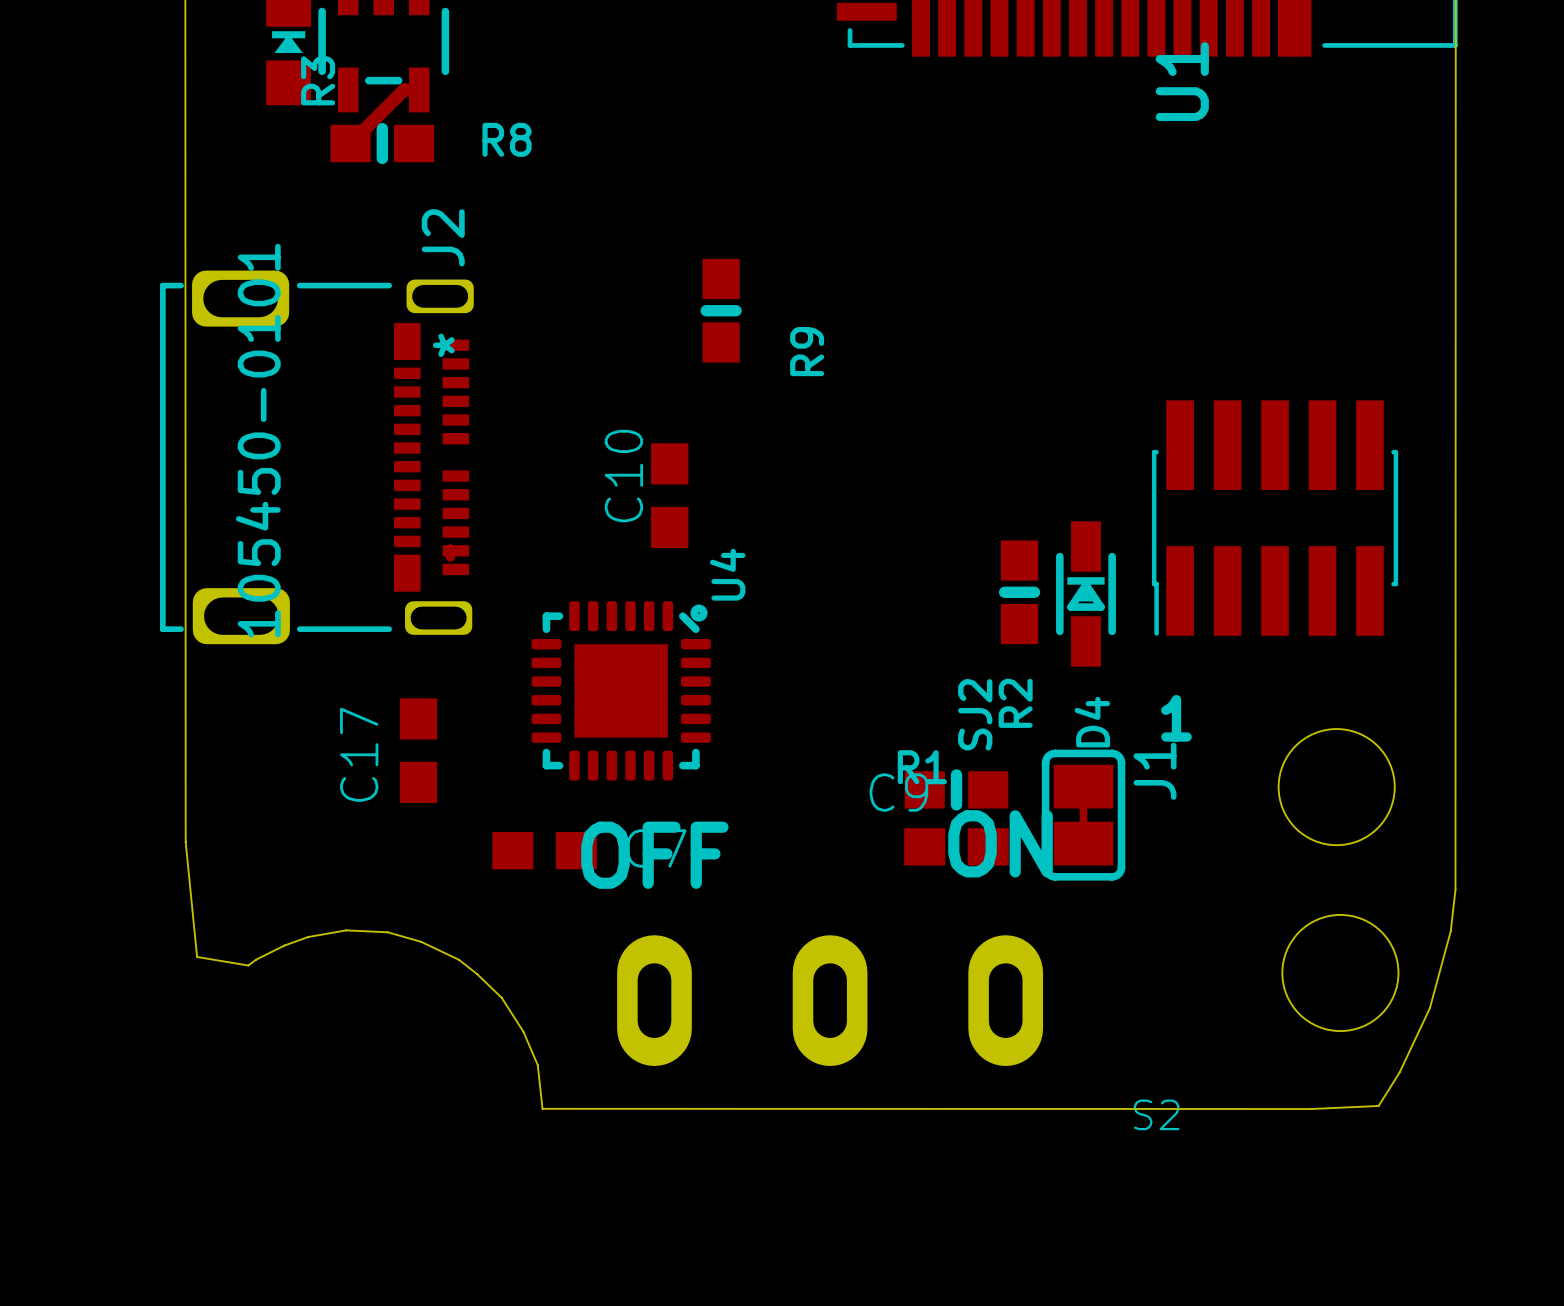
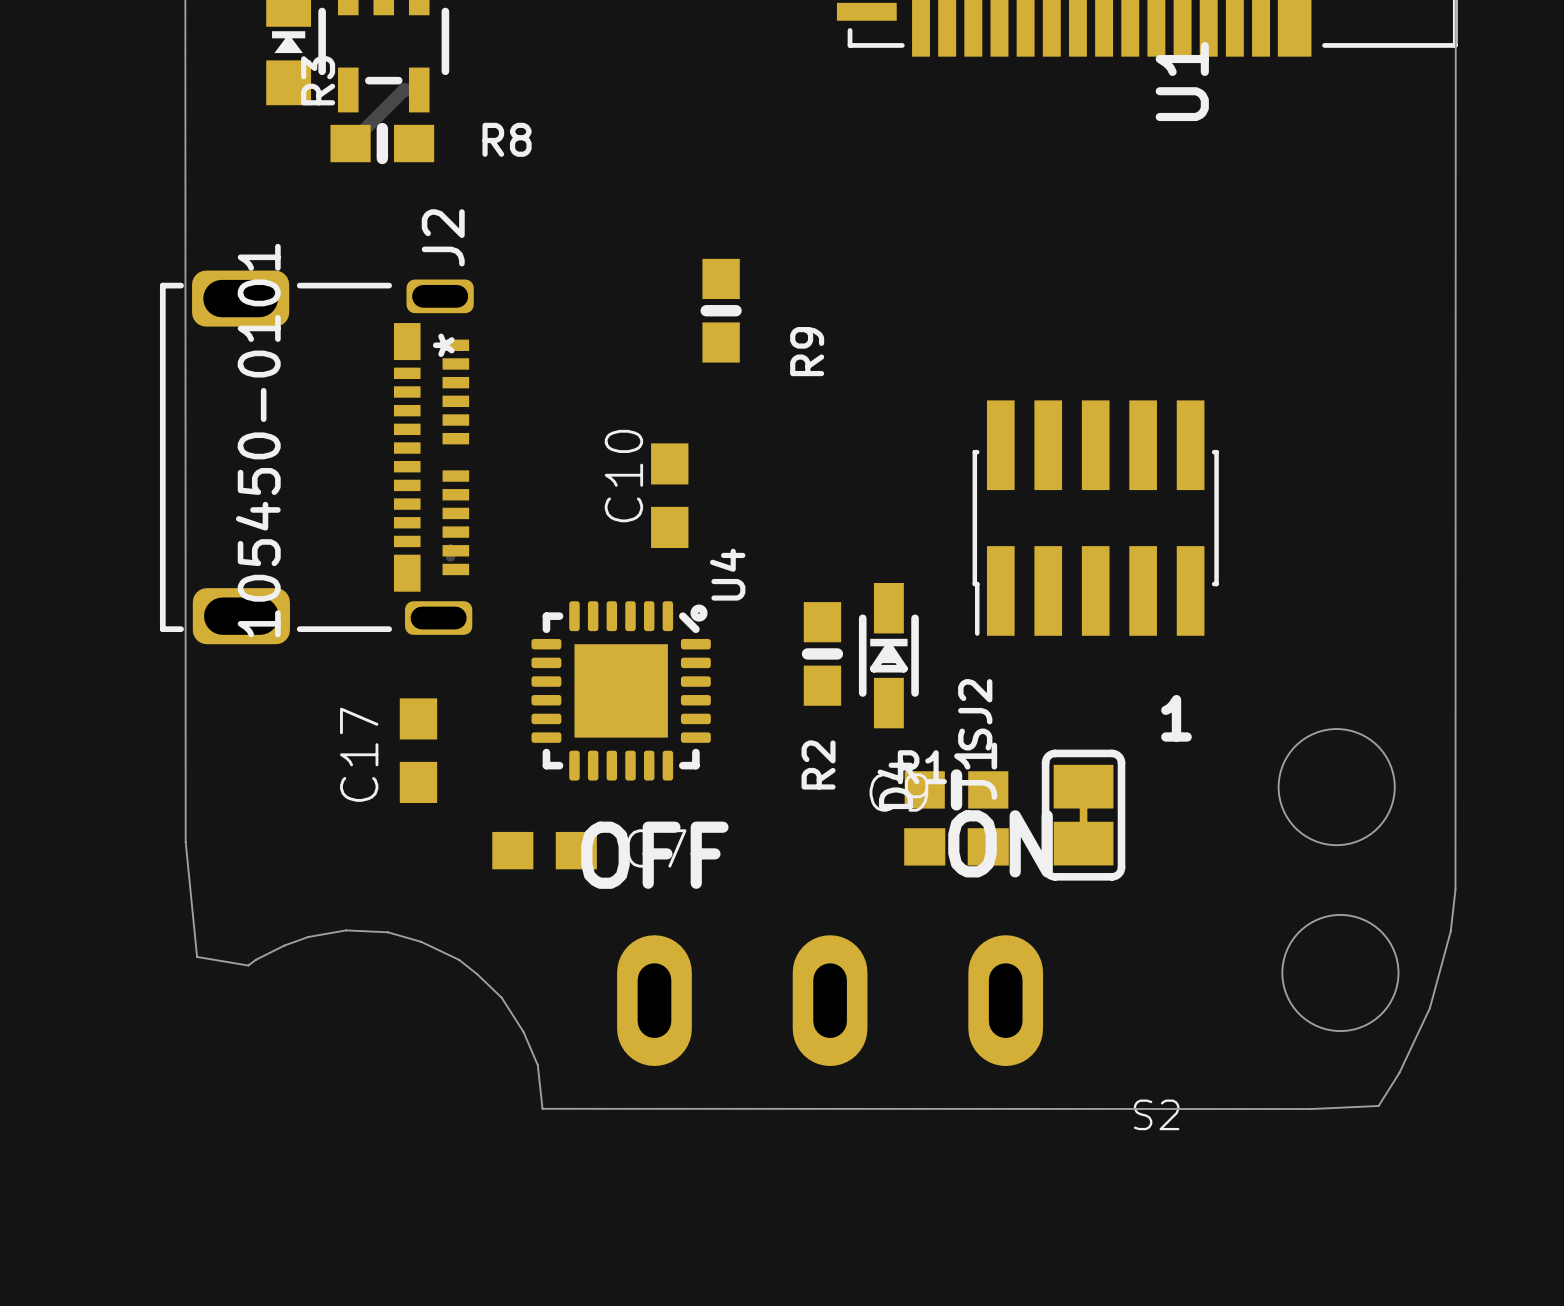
J1 position: (1275, 518) -> (1095, 518)
R2 position: (1019, 592) -> (822, 653)
D4 position: (1085, 594) -> (888, 655)

